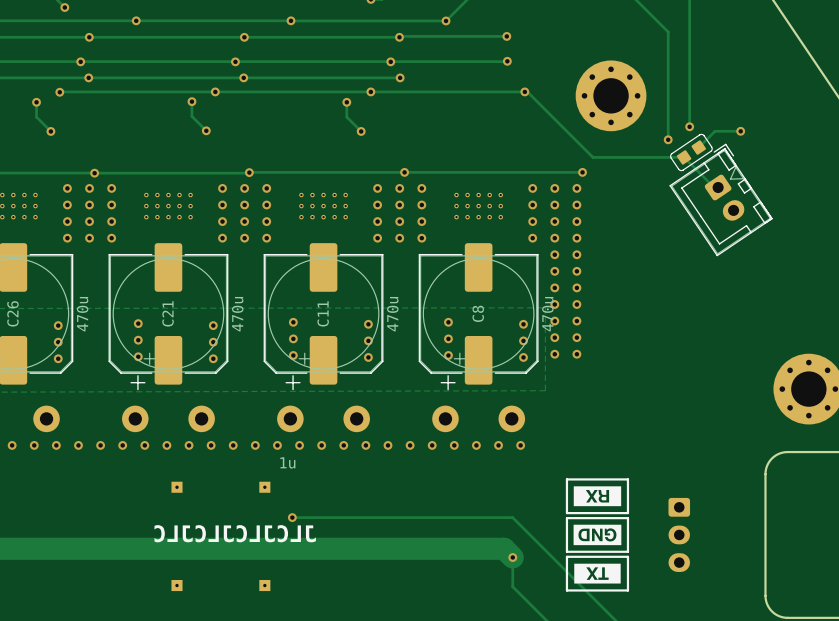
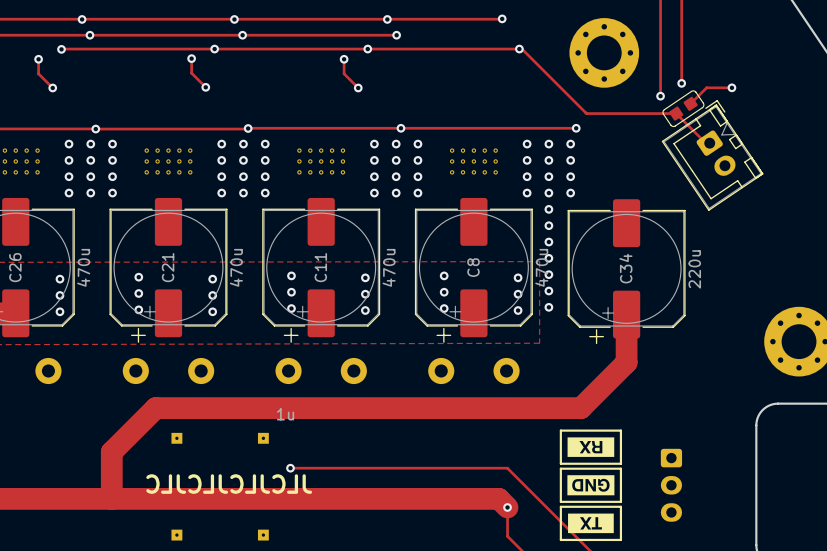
via: (576, 254) -> none
via: (576, 271) -> none
via: (576, 287) -> none
via: (576, 304) -> none
C34: none -> 220u (626, 271)
via: (576, 321) -> none
via: (576, 337) -> none
via: (576, 354) -> none
track: none -> (626, 314) (626, 362) (580, 408) (155, 408) (111, 452) (111, 498)
via: (12, 445) -> none
via: (34, 445) -> none
via: (56, 445) -> none
via: (78, 445) -> none
via: (100, 445) -> none
via: (122, 445) -> none
via: (144, 445) -> none
via: (166, 445) -> none
via: (189, 445) -> none
via: (211, 445) -> none
via: (233, 445) -> none
via: (255, 445) -> none
via: (277, 445) -> none
via: (299, 445) -> none
via: (321, 445) -> none
via: (343, 445) -> none
via: (365, 445) -> none
via: (387, 445) -> none
via: (410, 445) -> none
via: (432, 445) -> none
via: (454, 445) -> none
via: (476, 445) -> none
via: (498, 445) -> none
via: (520, 445) -> none

